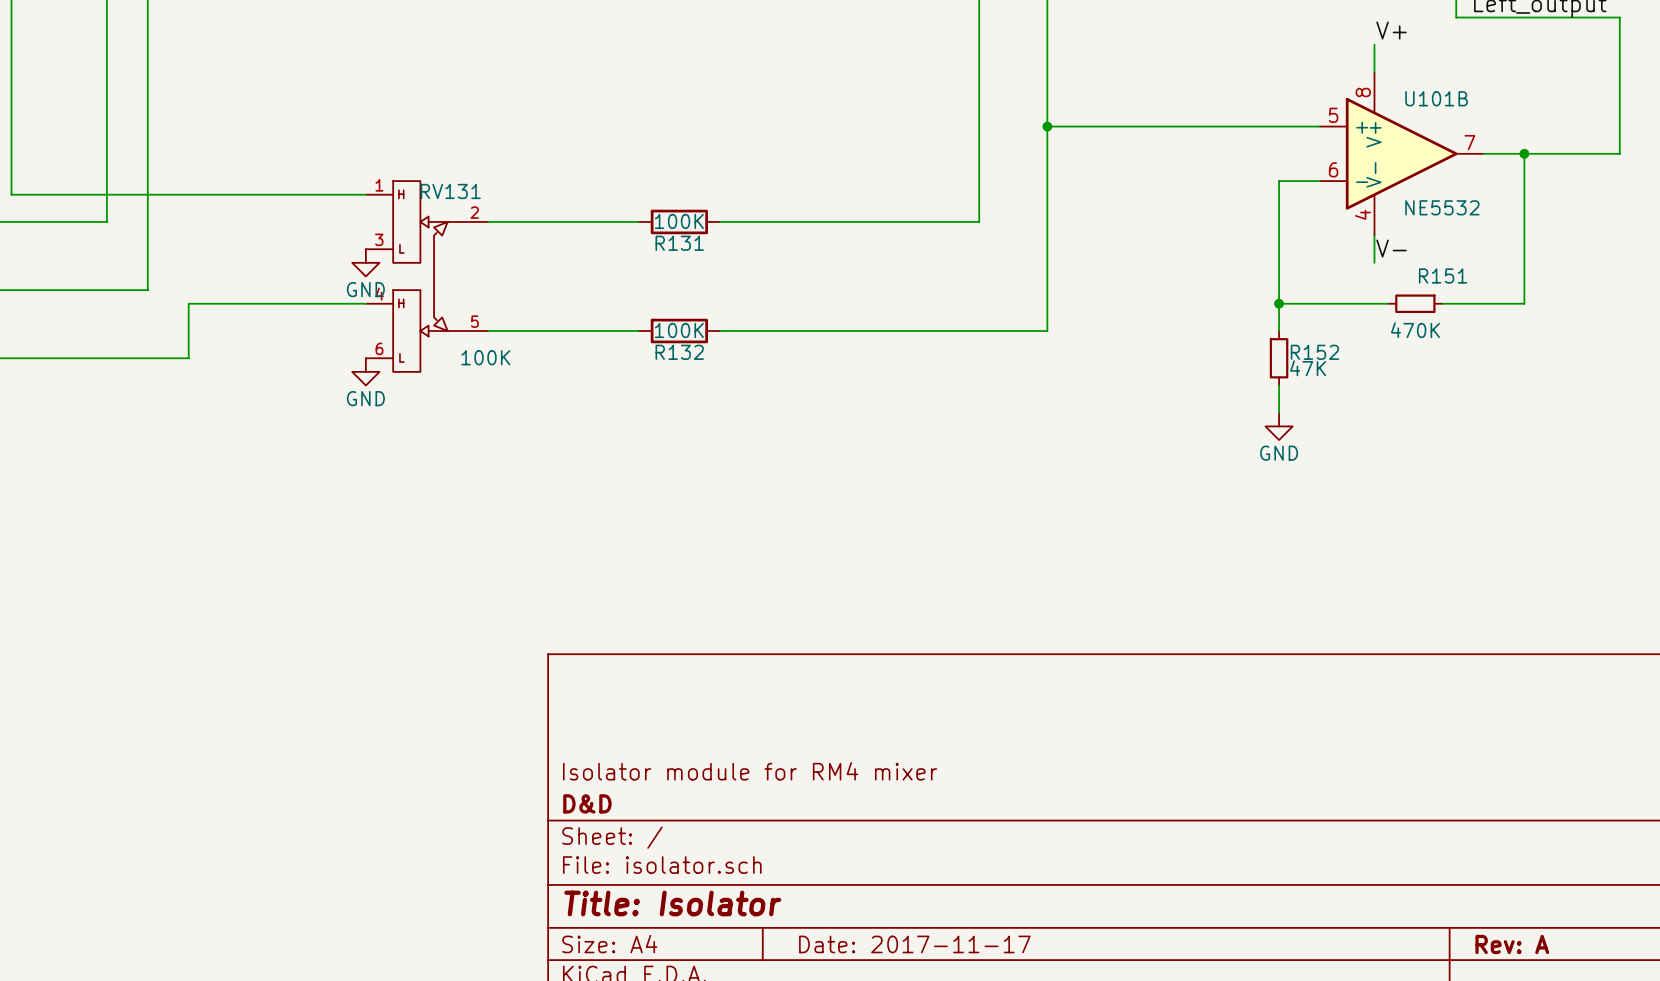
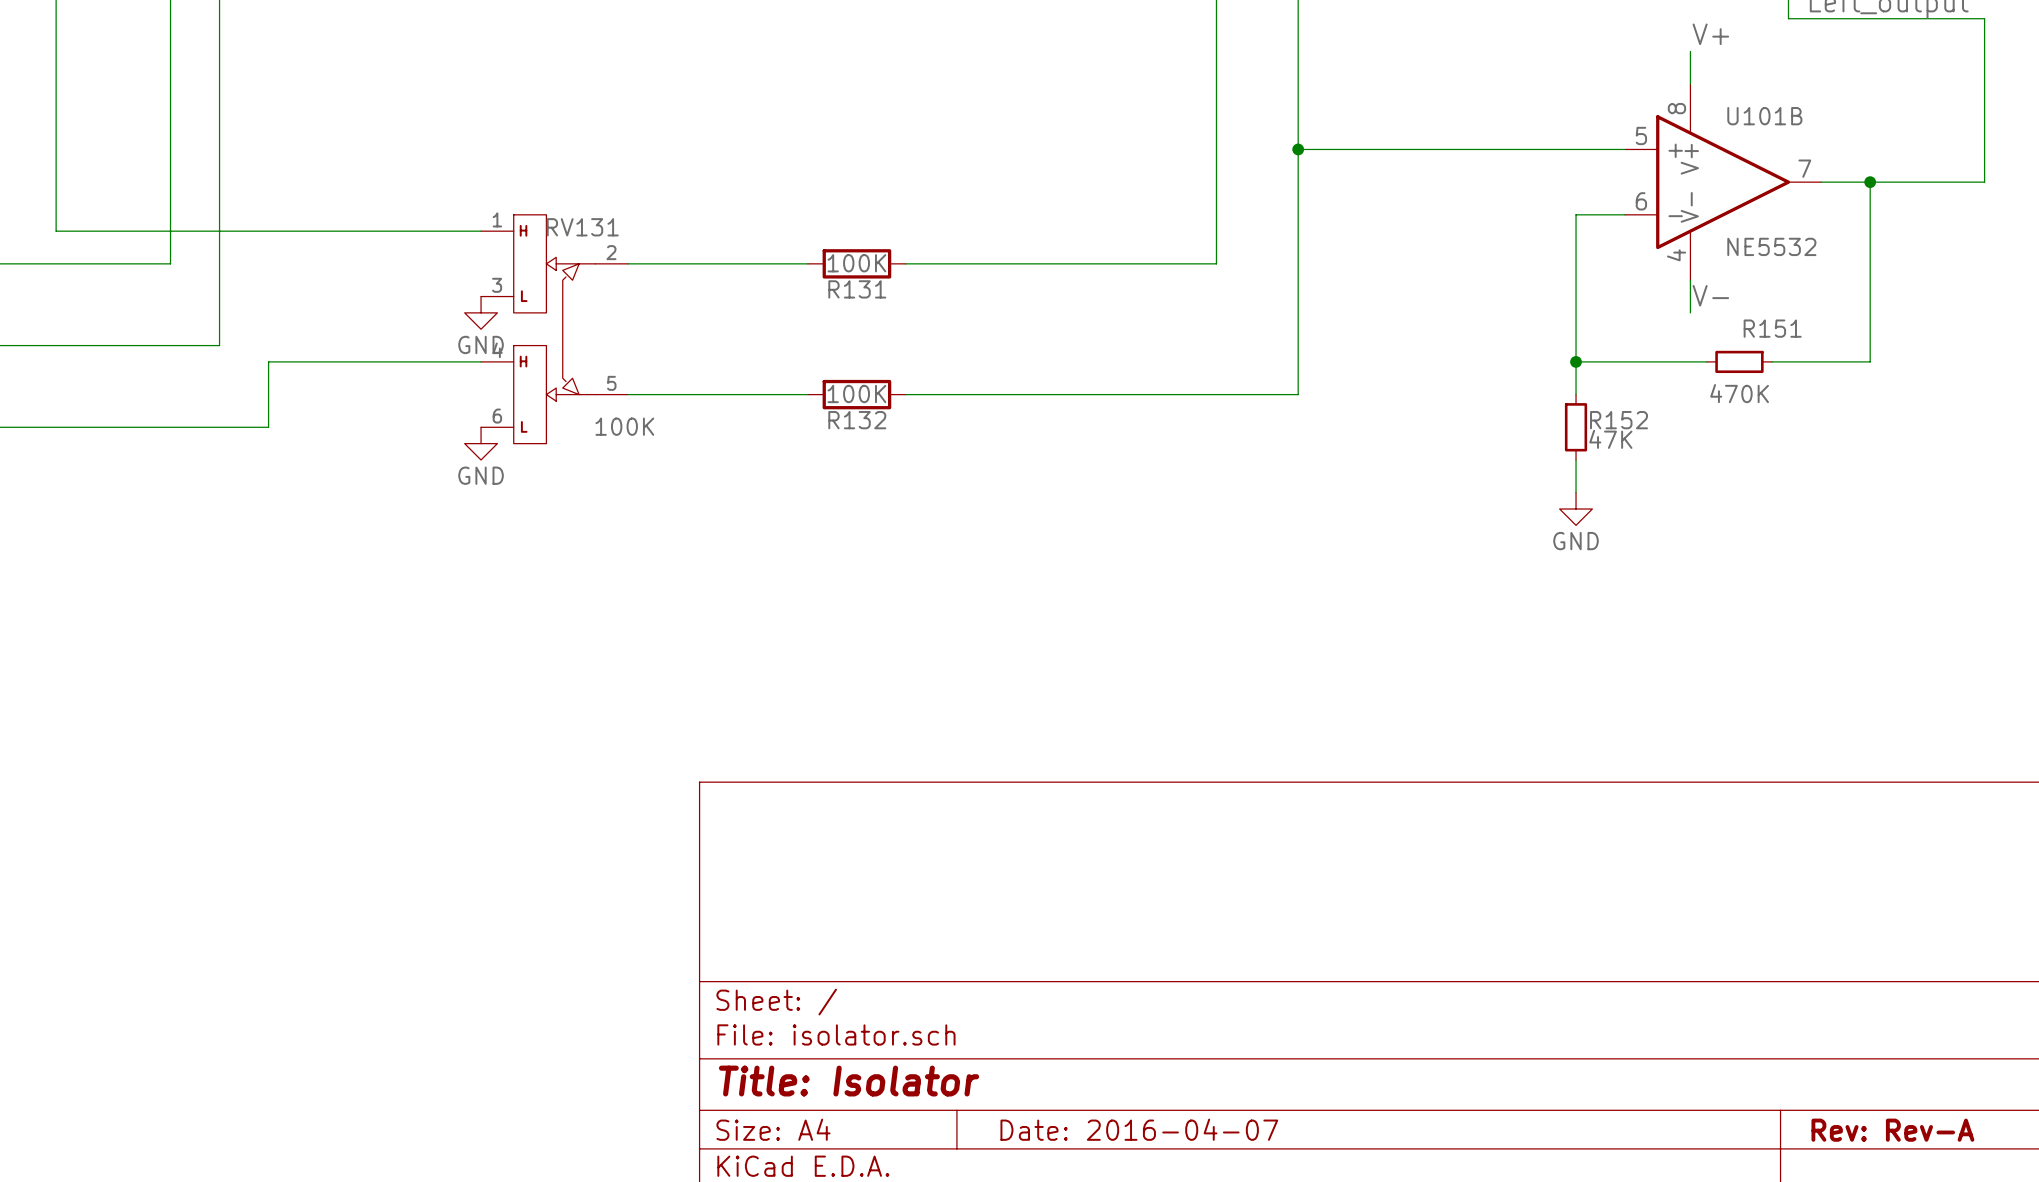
title block: Isolator module for RM4 mixer (750, 771) -> none
title block: D&D (587, 803) -> none
title block: Date: 2017-11-17 (914, 944) -> Date: 2016-04-07 (1139, 1129)
title block: Rev: A (1512, 944) -> Rev: Rev-A (1892, 1130)

